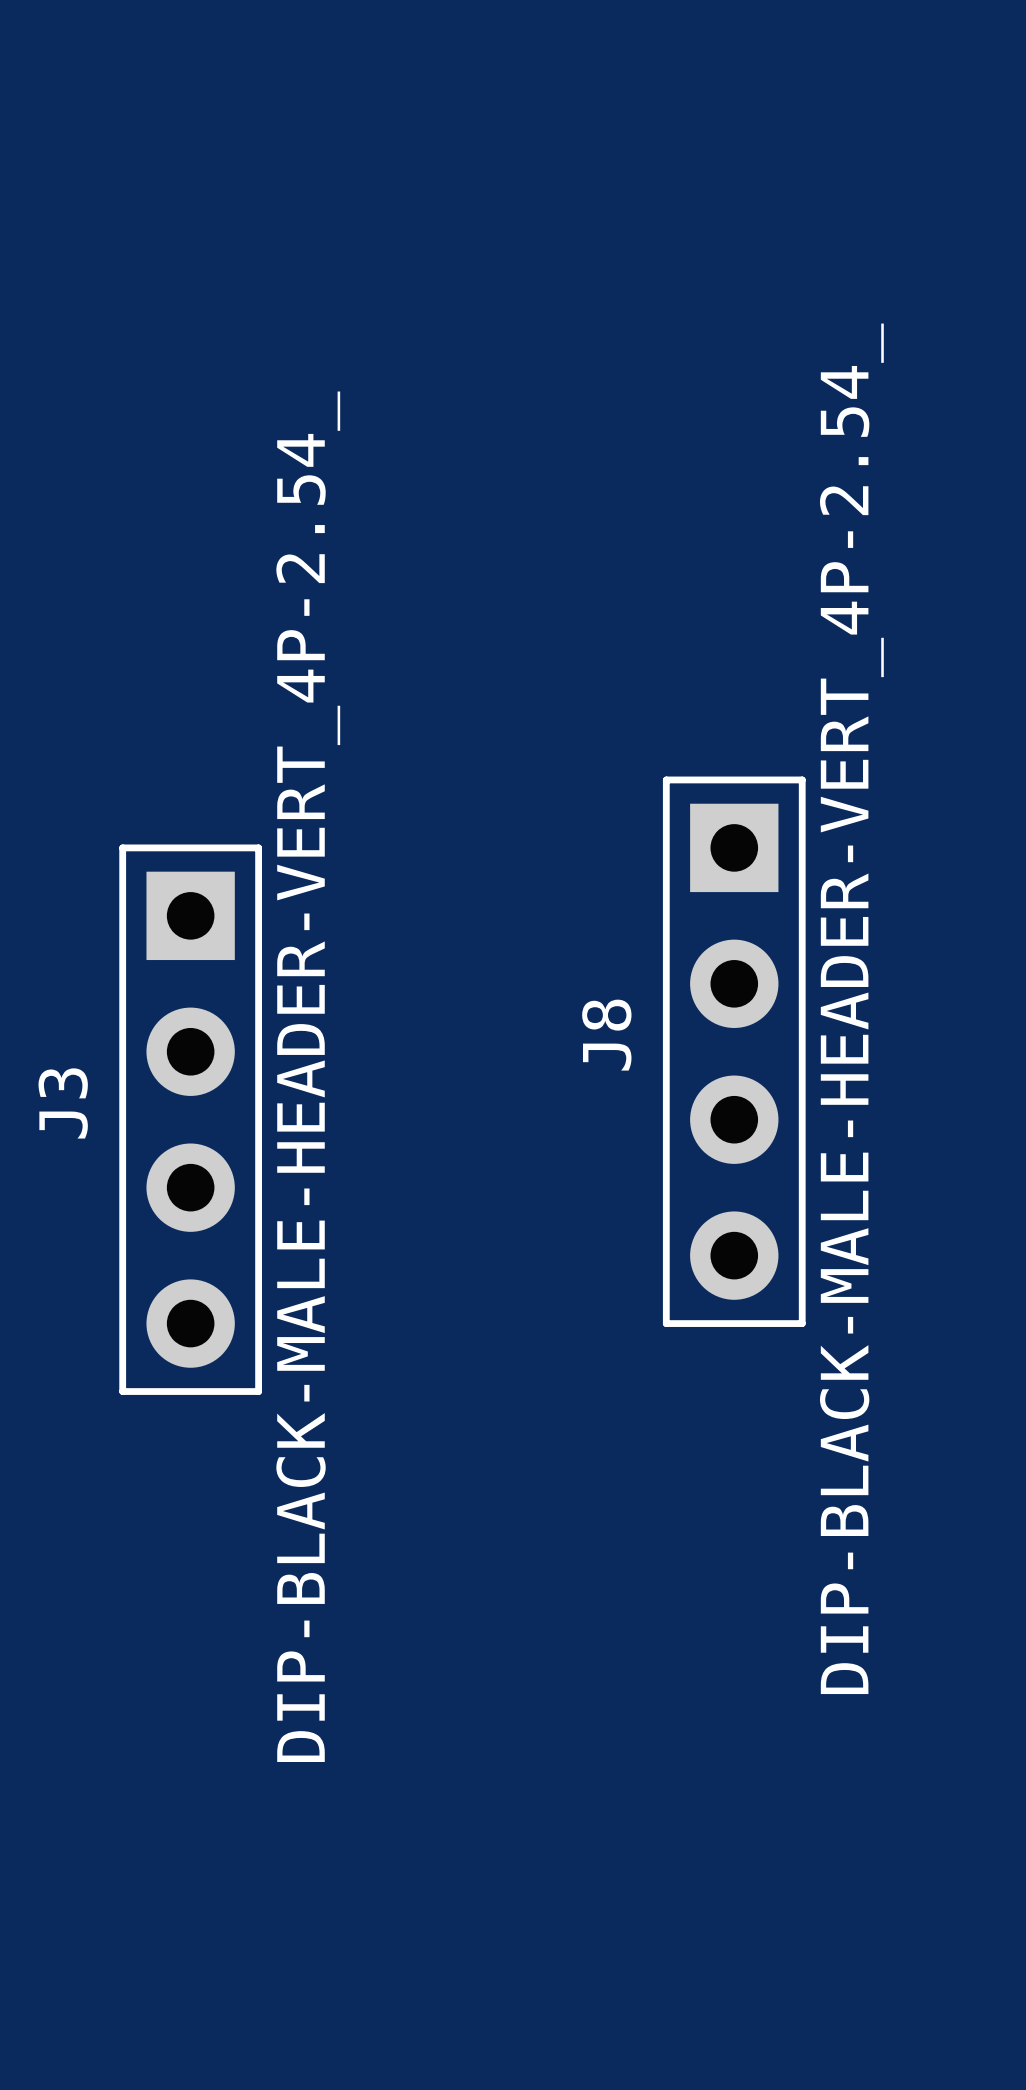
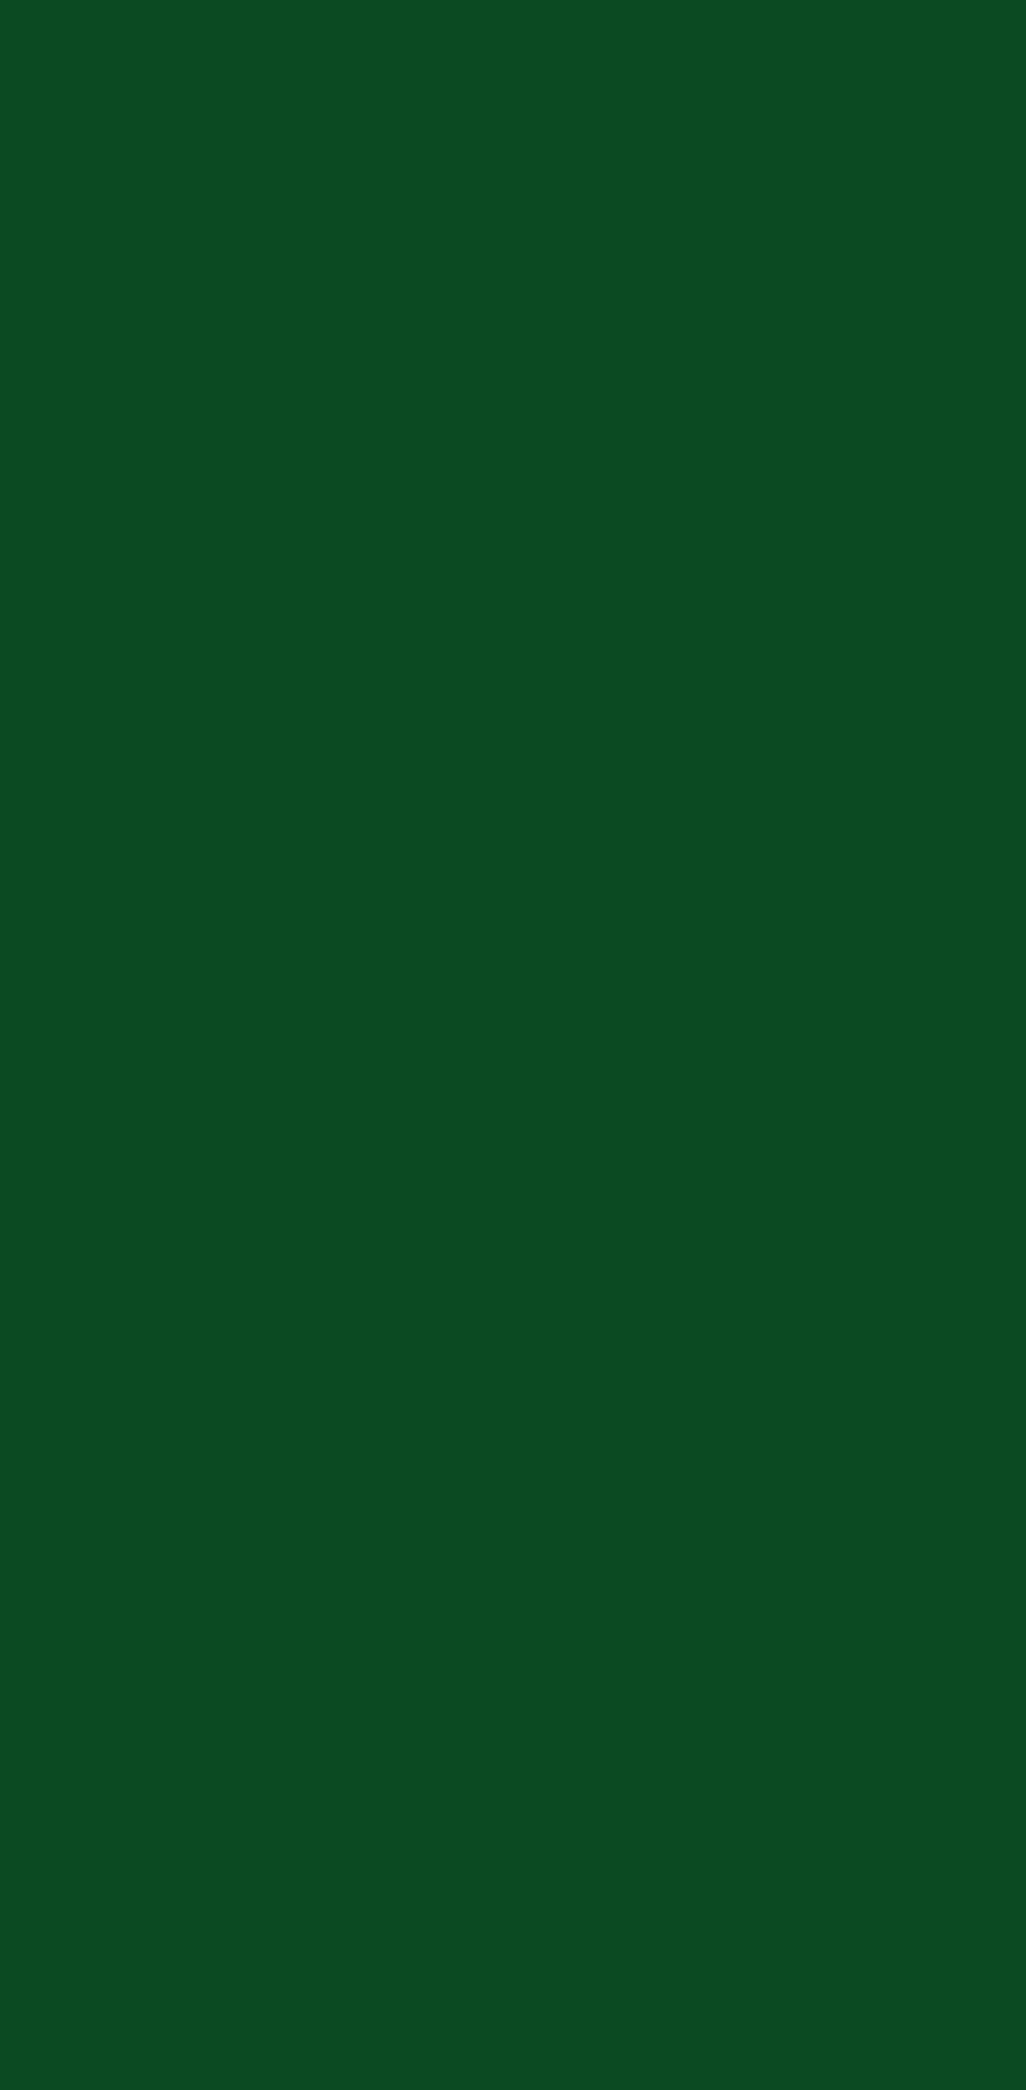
J8: DIP-BLACK-MALE-HEADER-VERT_4P-2.54_ (734, 1051) -> none
J3: DIP-BLACK-MALE-HEADER-VERT_4P-2.54_ (190, 1119) -> none

